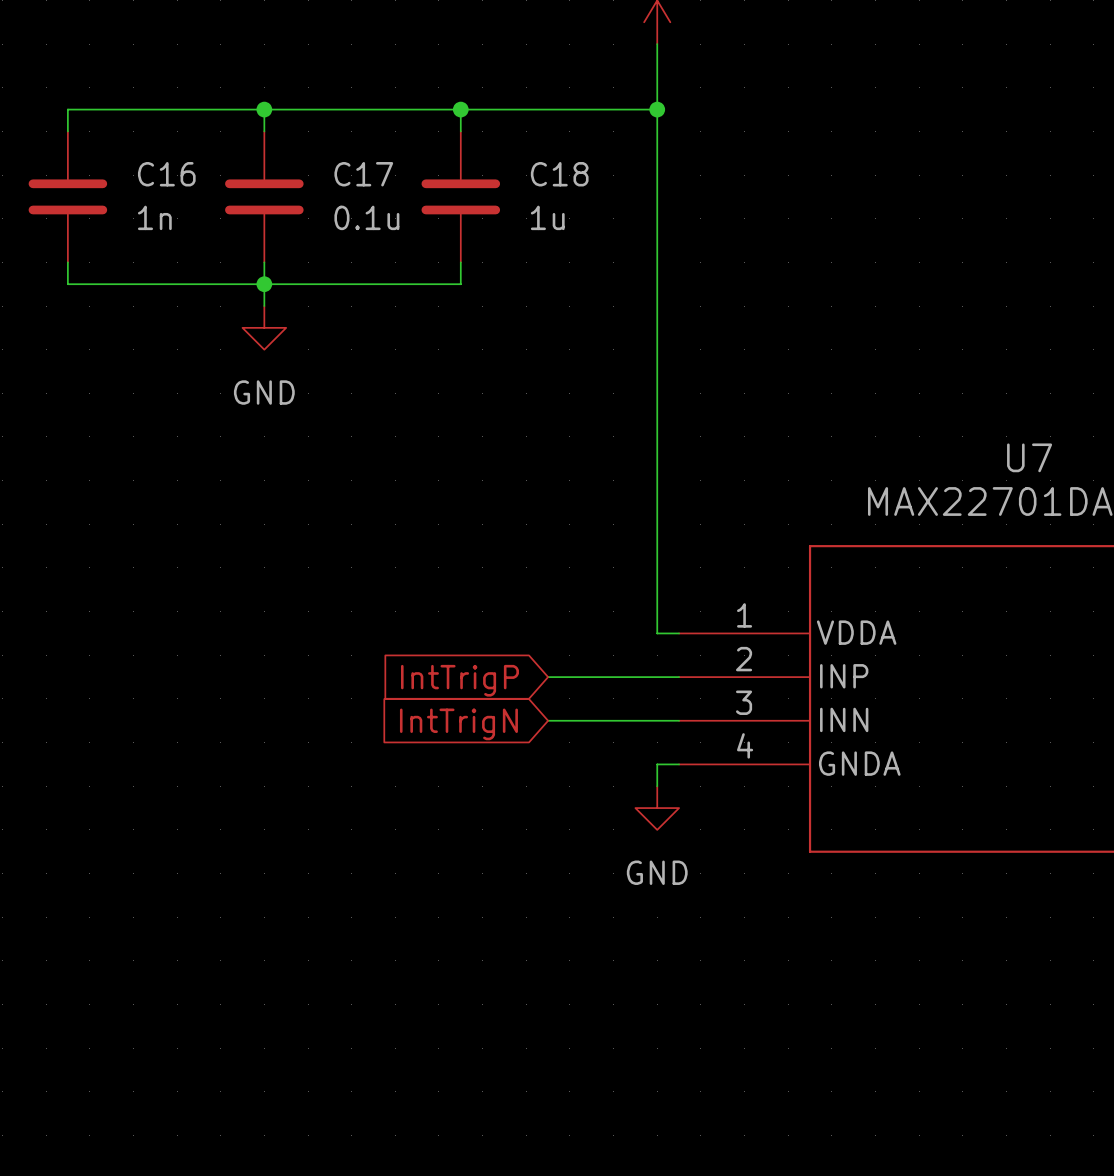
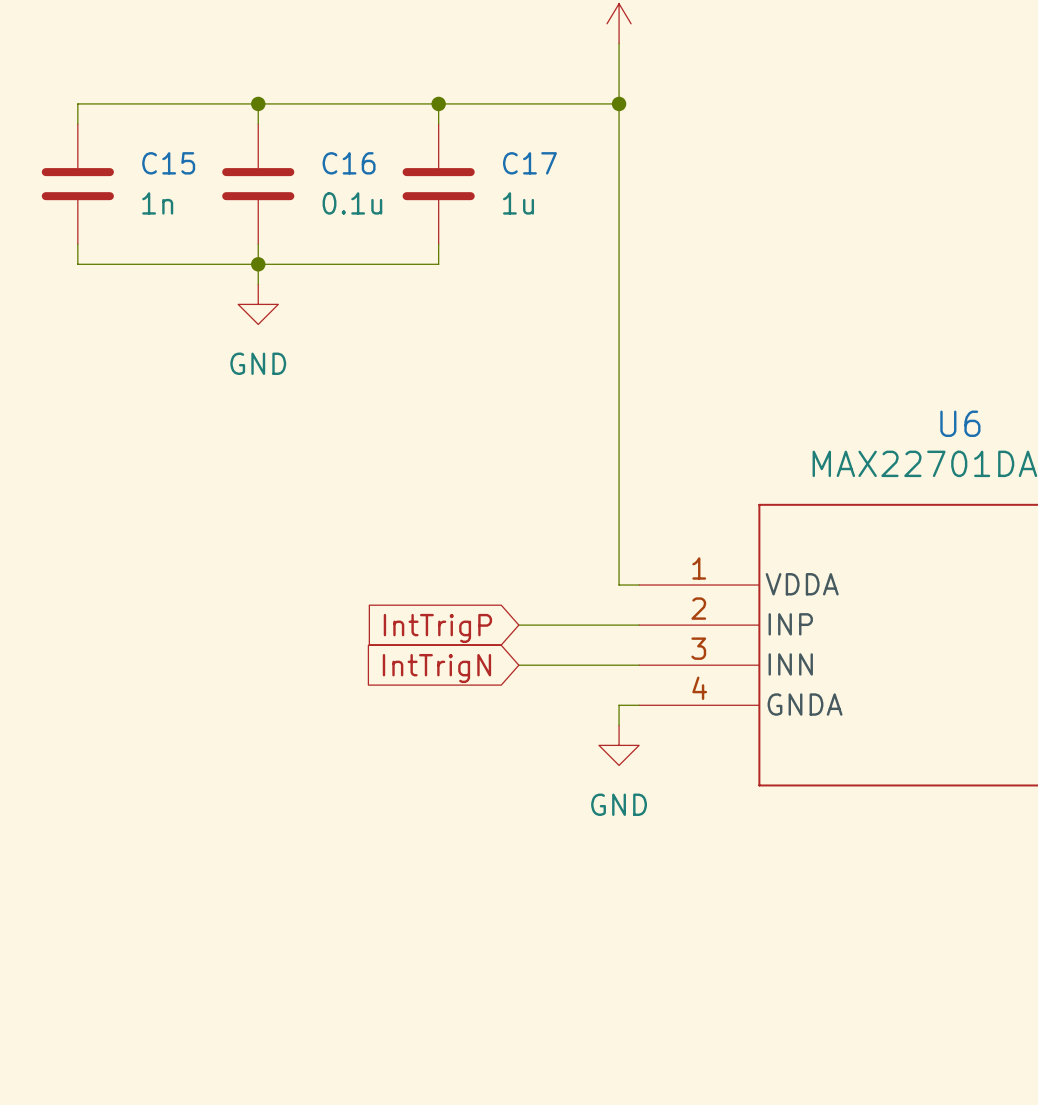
C16 name: C16 (166, 174) -> C15 (168, 163)
C17 name: C17 (363, 174) -> C16 (349, 163)
C18 name: C18 (559, 174) -> C17 (529, 163)
U7 name: U7 (1029, 457) -> U6 (960, 423)

